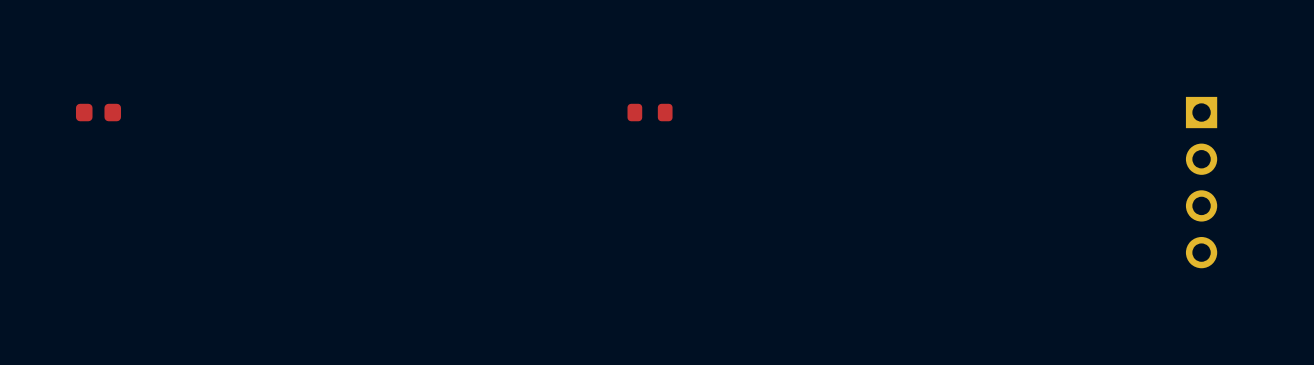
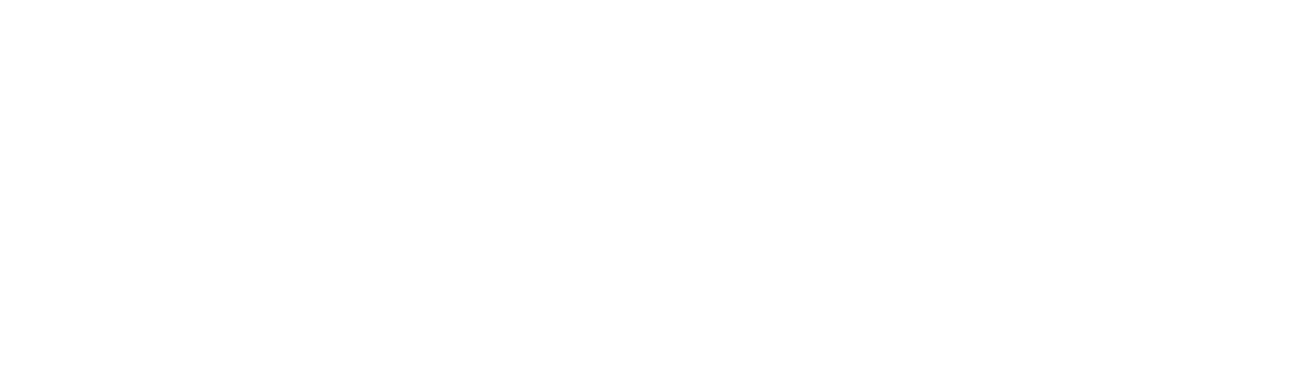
part: (98, 112) -> none
part: (650, 112) -> none
part: (1201, 182) -> none

